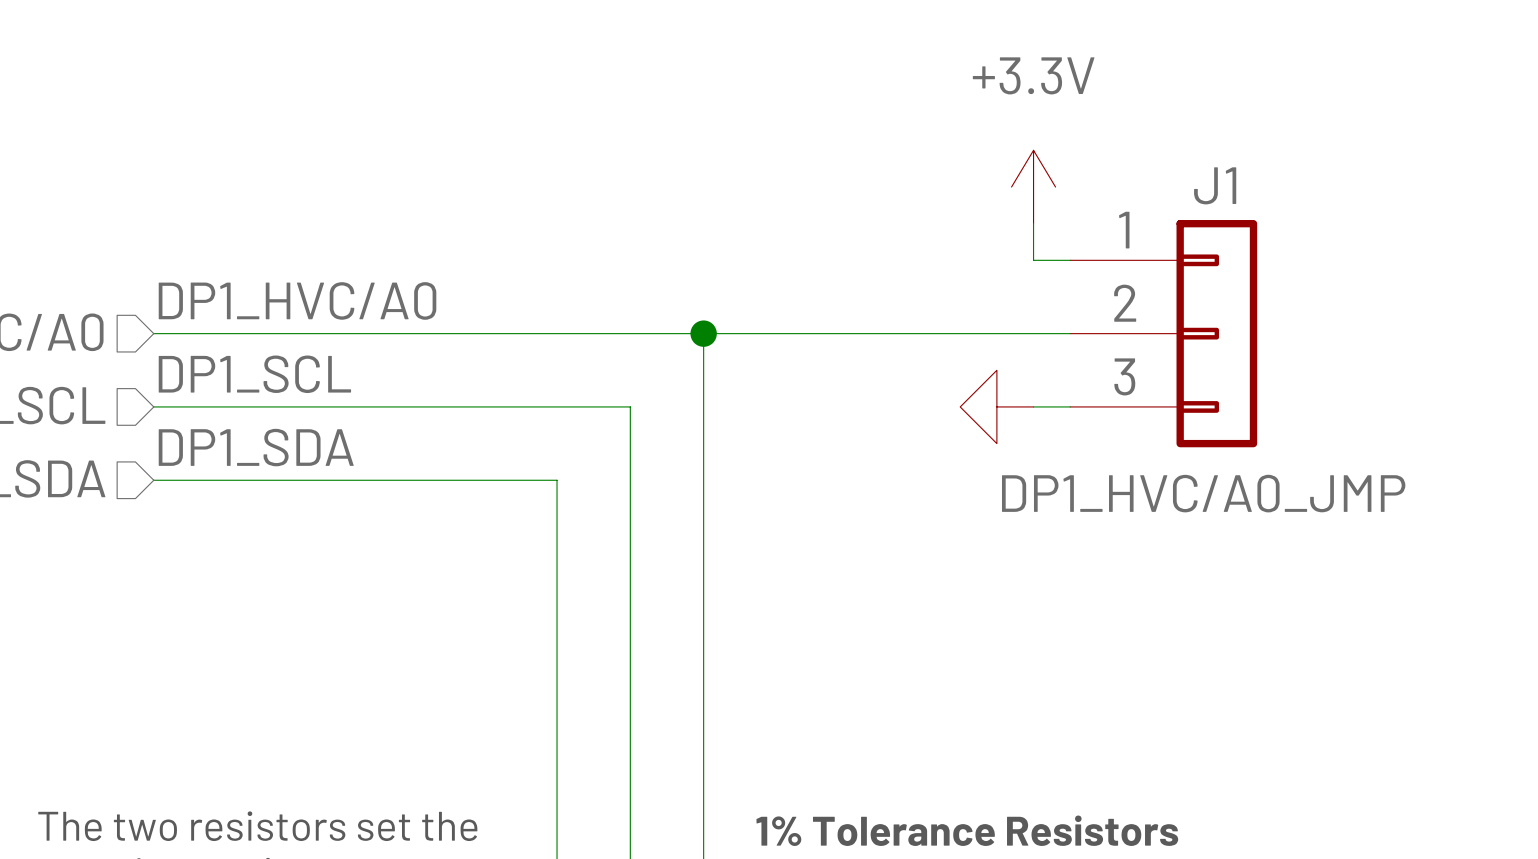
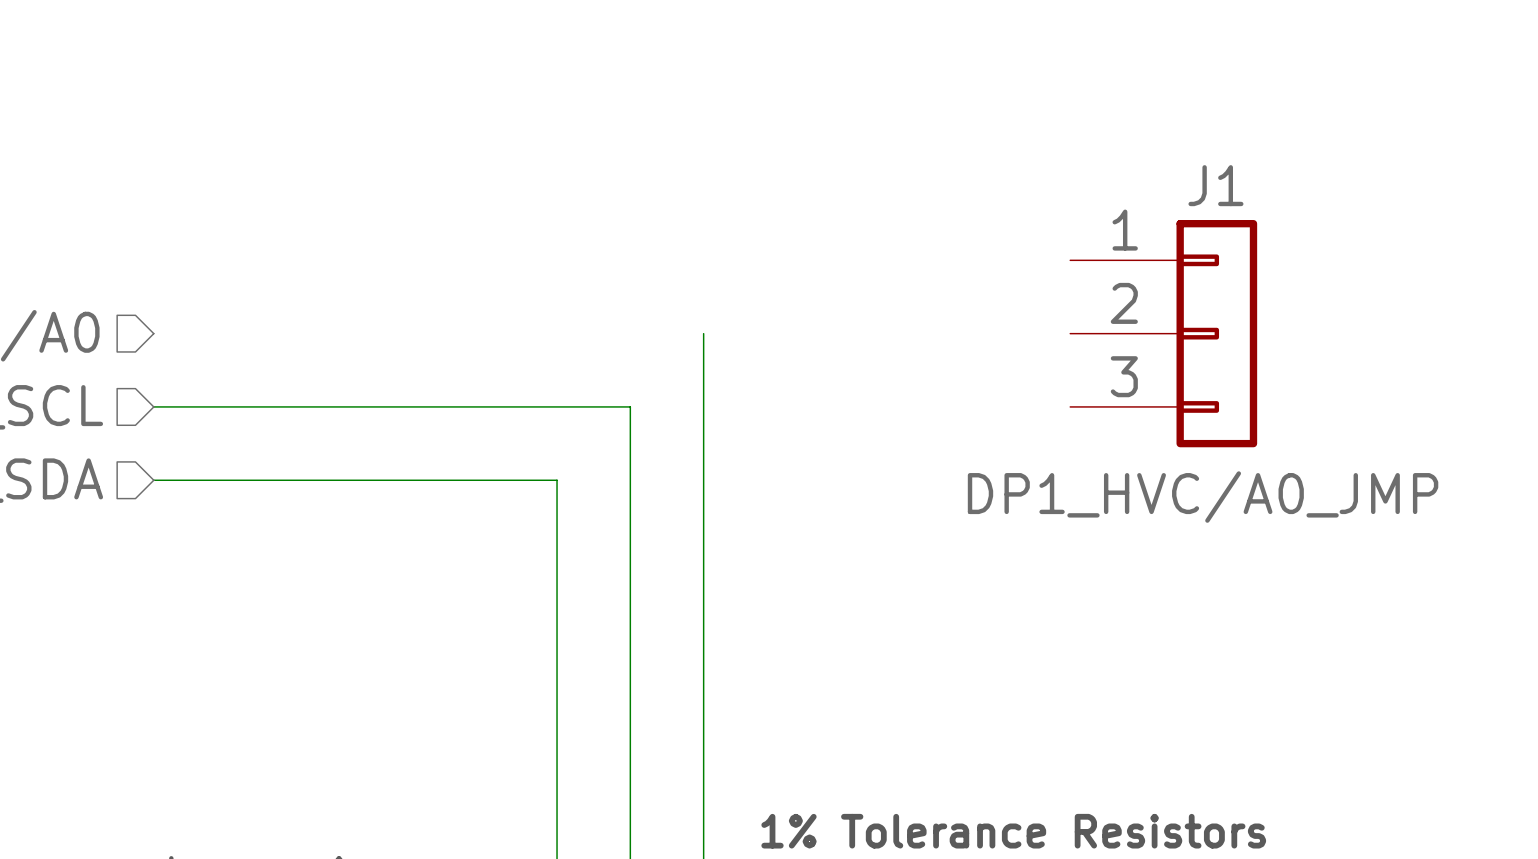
power symbol: +3.3V (1033, 187) -> none
wire: (1033, 223) (1033, 260) (1070, 260) -> none
label: DP1_HVC/A0 (297, 300) -> none
wire: (153, 333) (1070, 333) -> none
junction: (703, 333) -> none
label: DP1_SCL (254, 374) -> none
power symbol: (996, 406) -> none
wire: (1033, 406) (1070, 406) -> none
label: DP1_SDA (256, 447) -> none
text: The two resistors set the (257, 826) -> none

